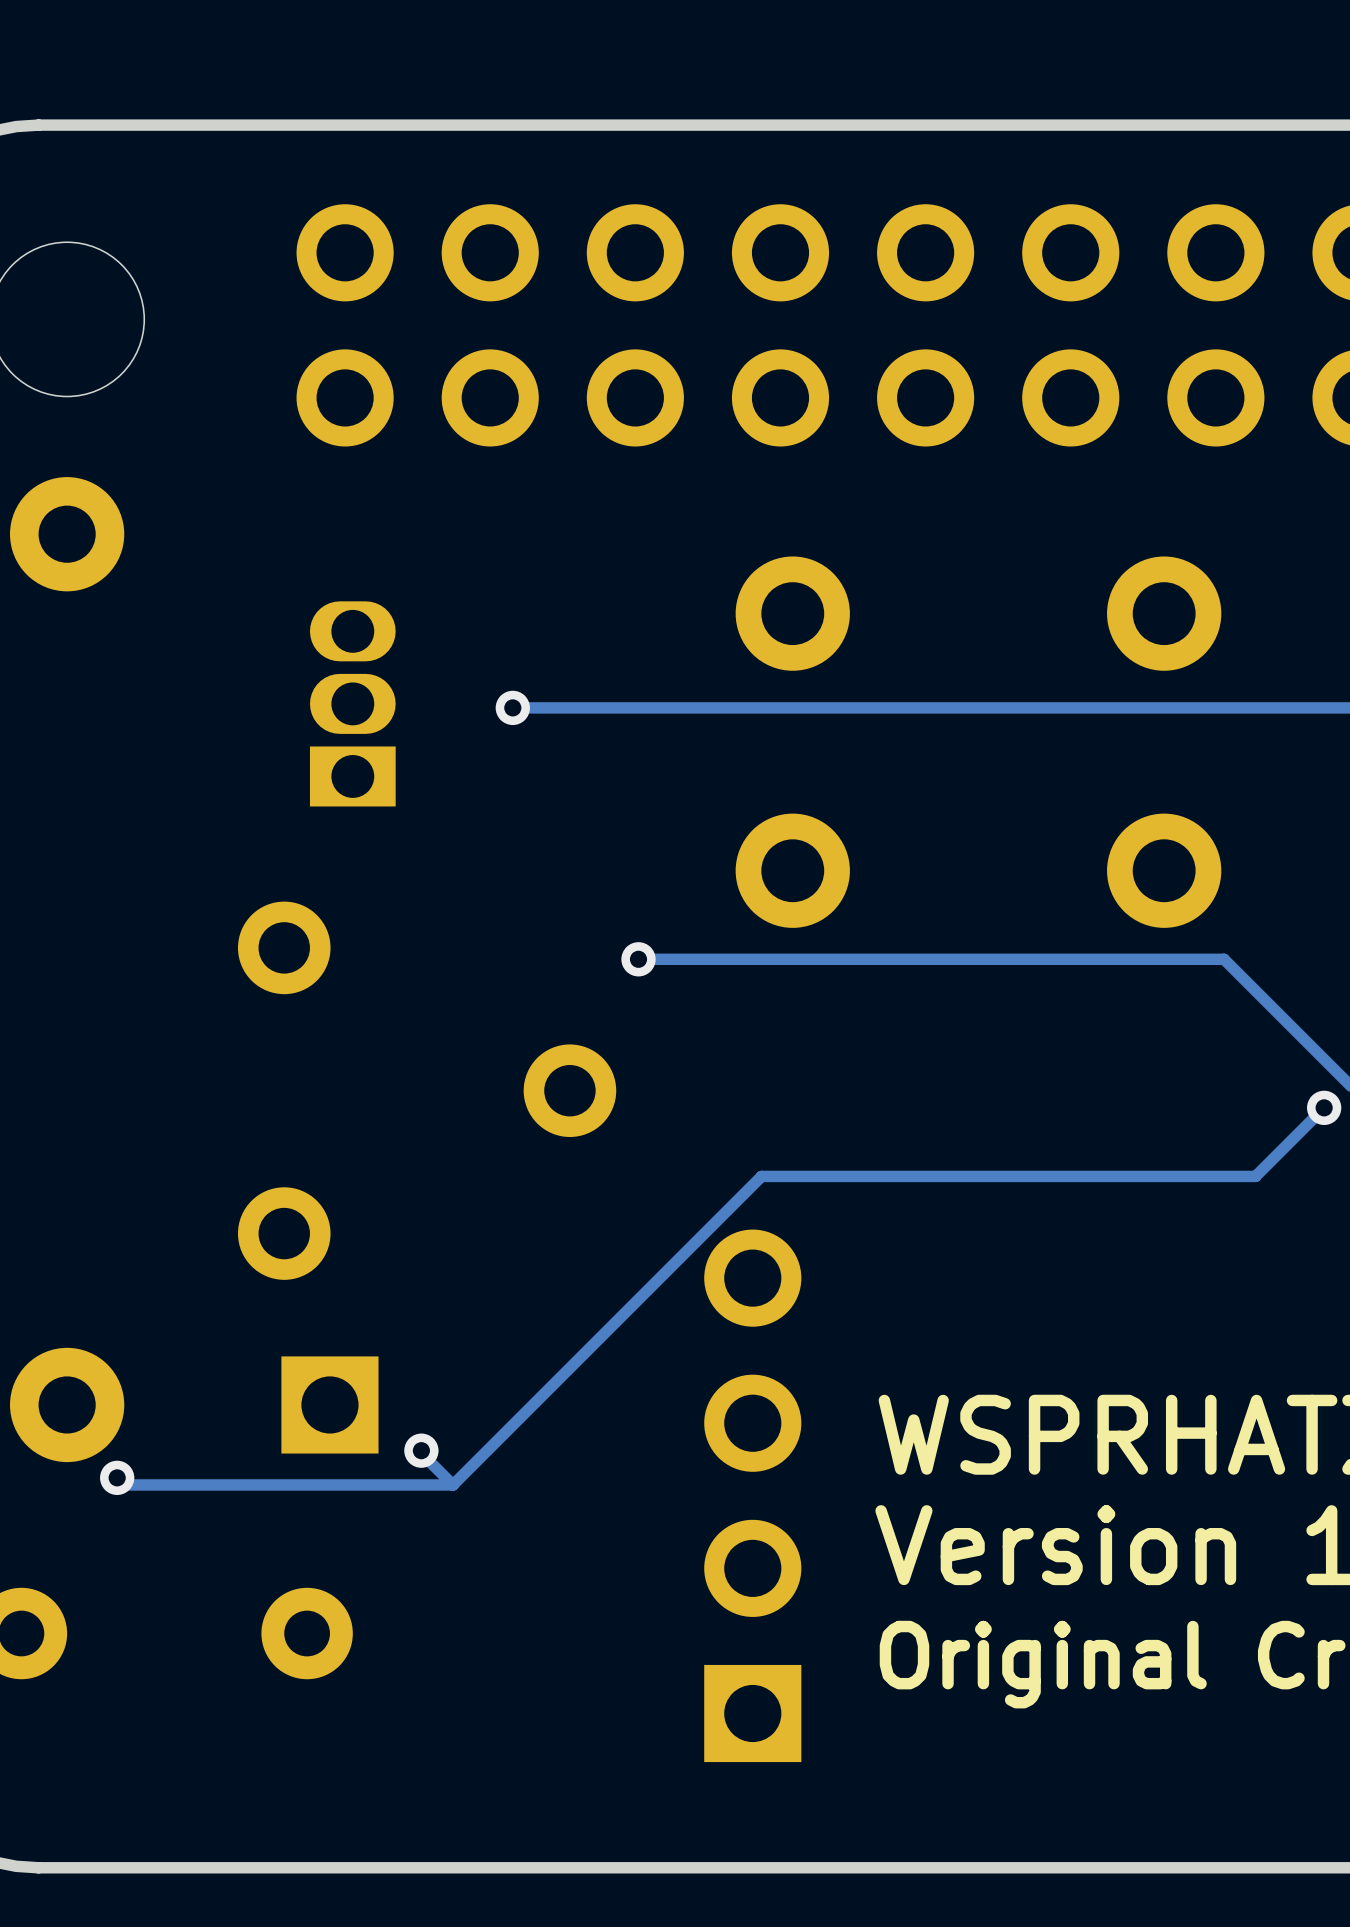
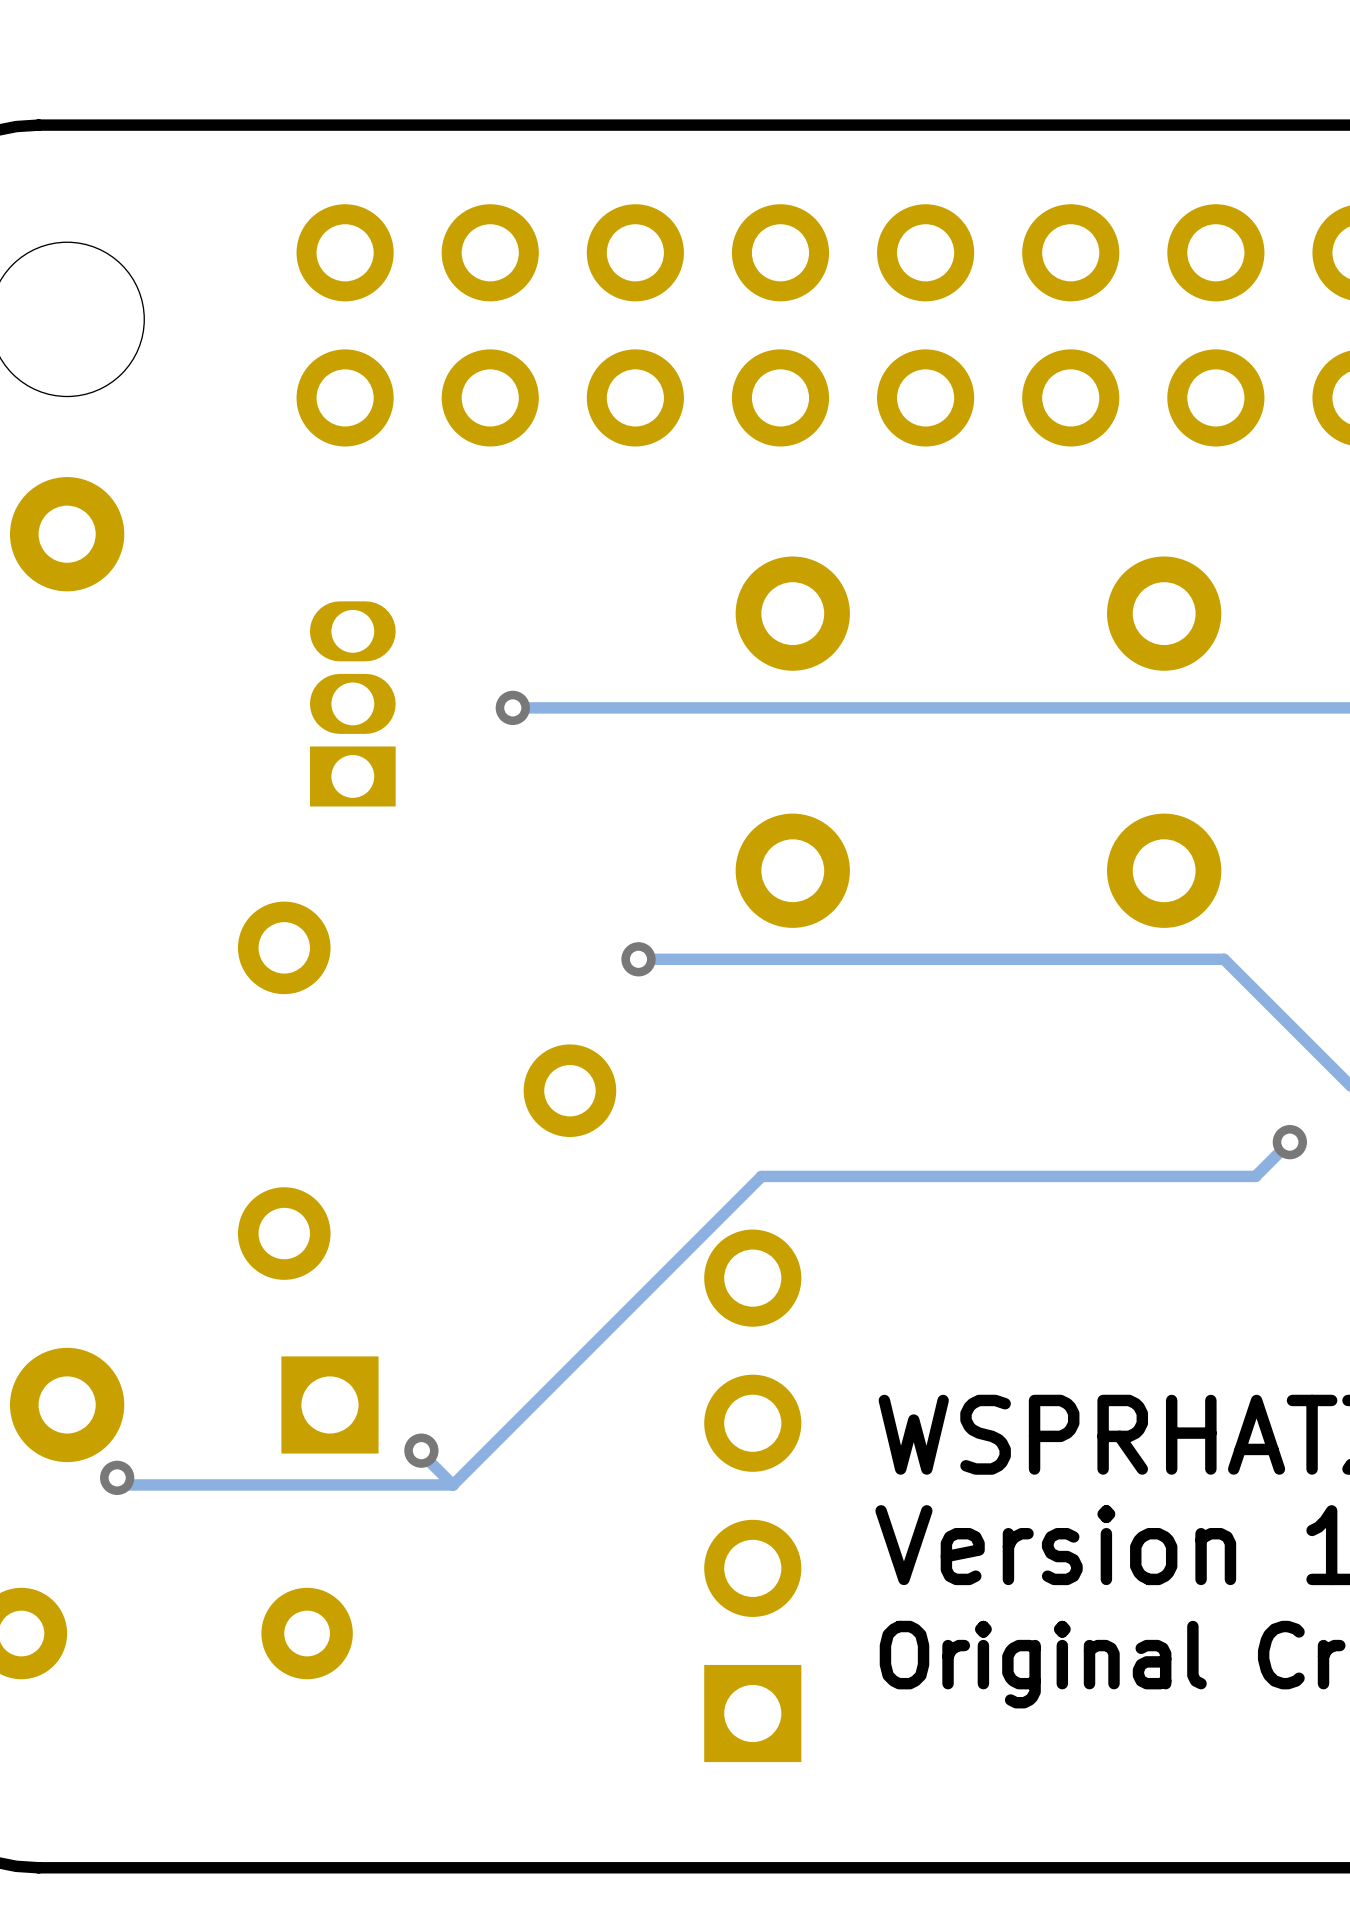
track: (1324, 1107) (1289, 1142) -> none
via position: (1324, 1107) -> (1289, 1142)

